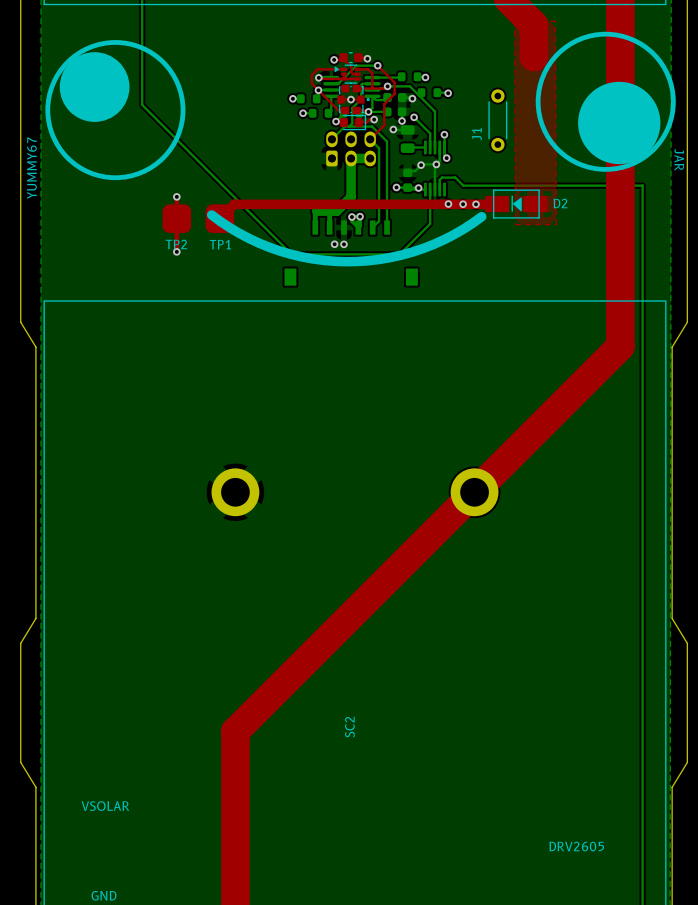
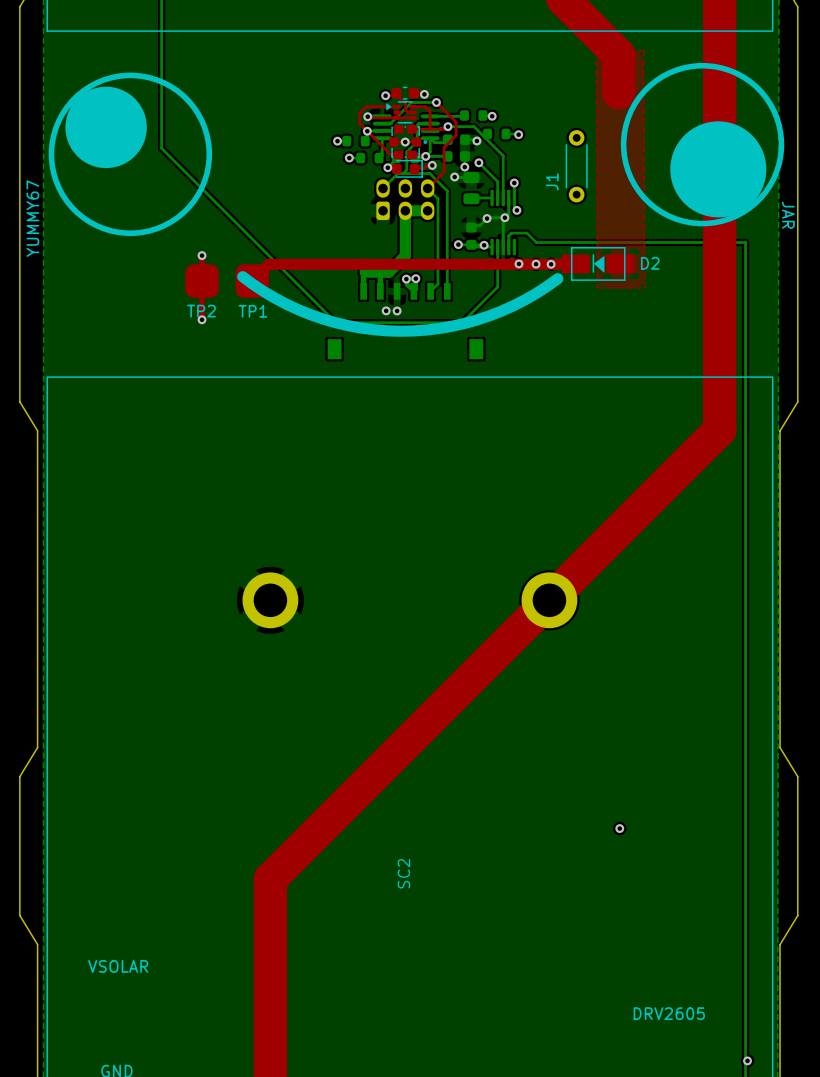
via: none -> (619, 828)
via: none -> (747, 1060)

